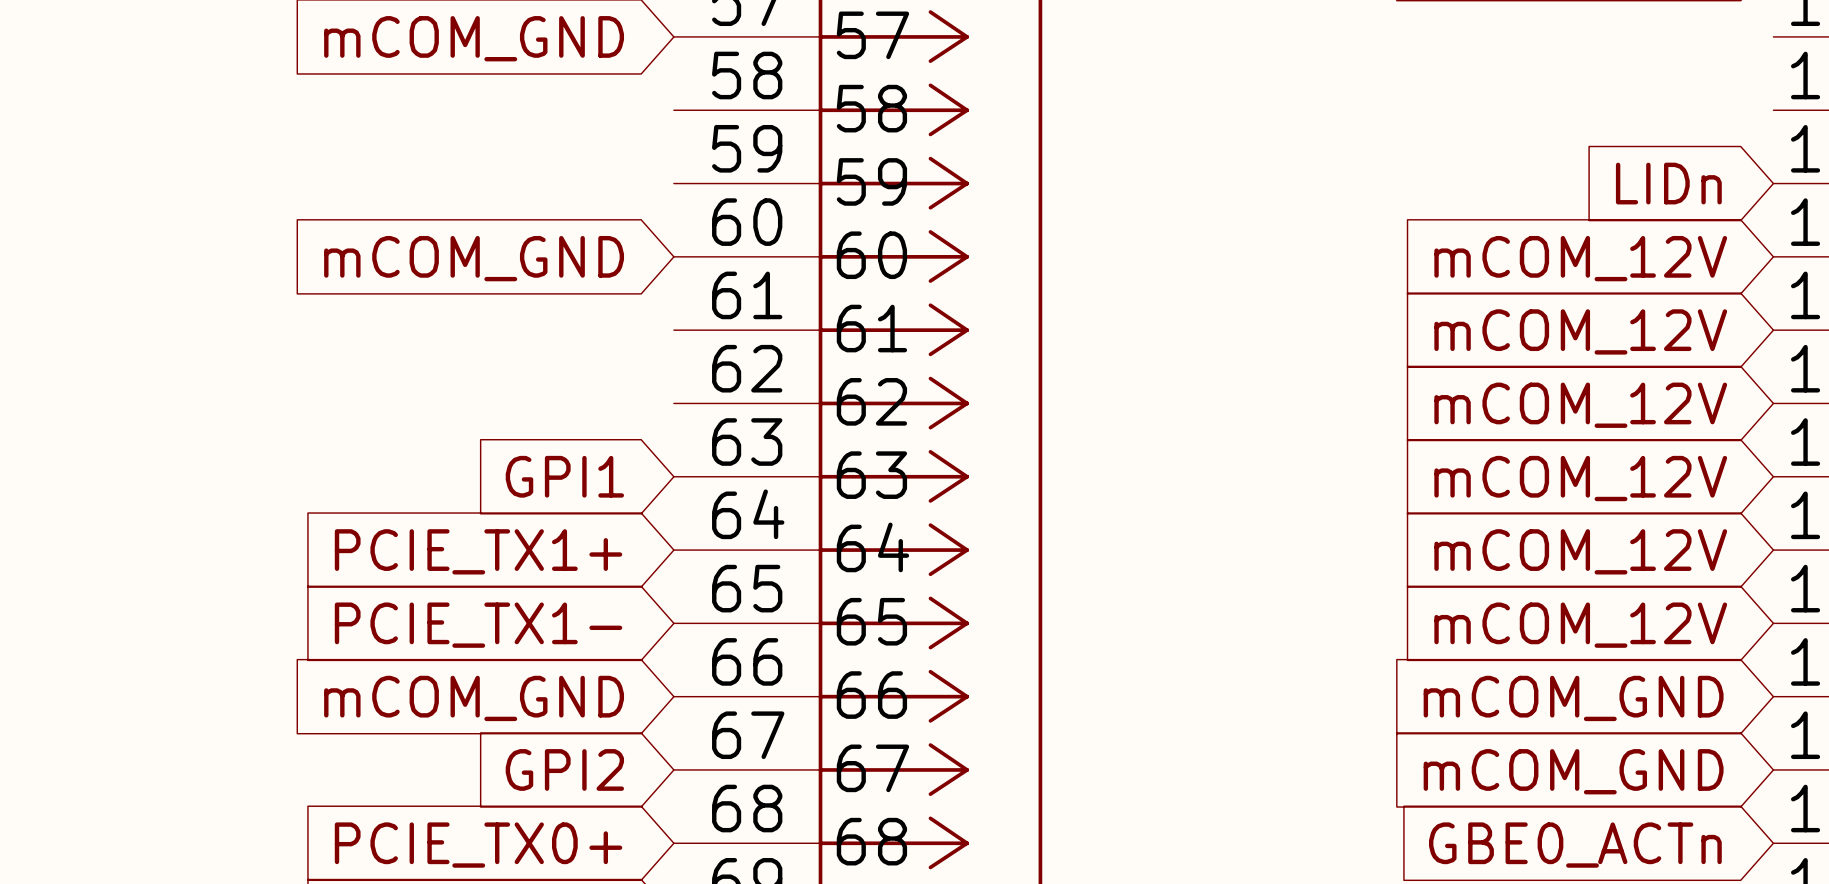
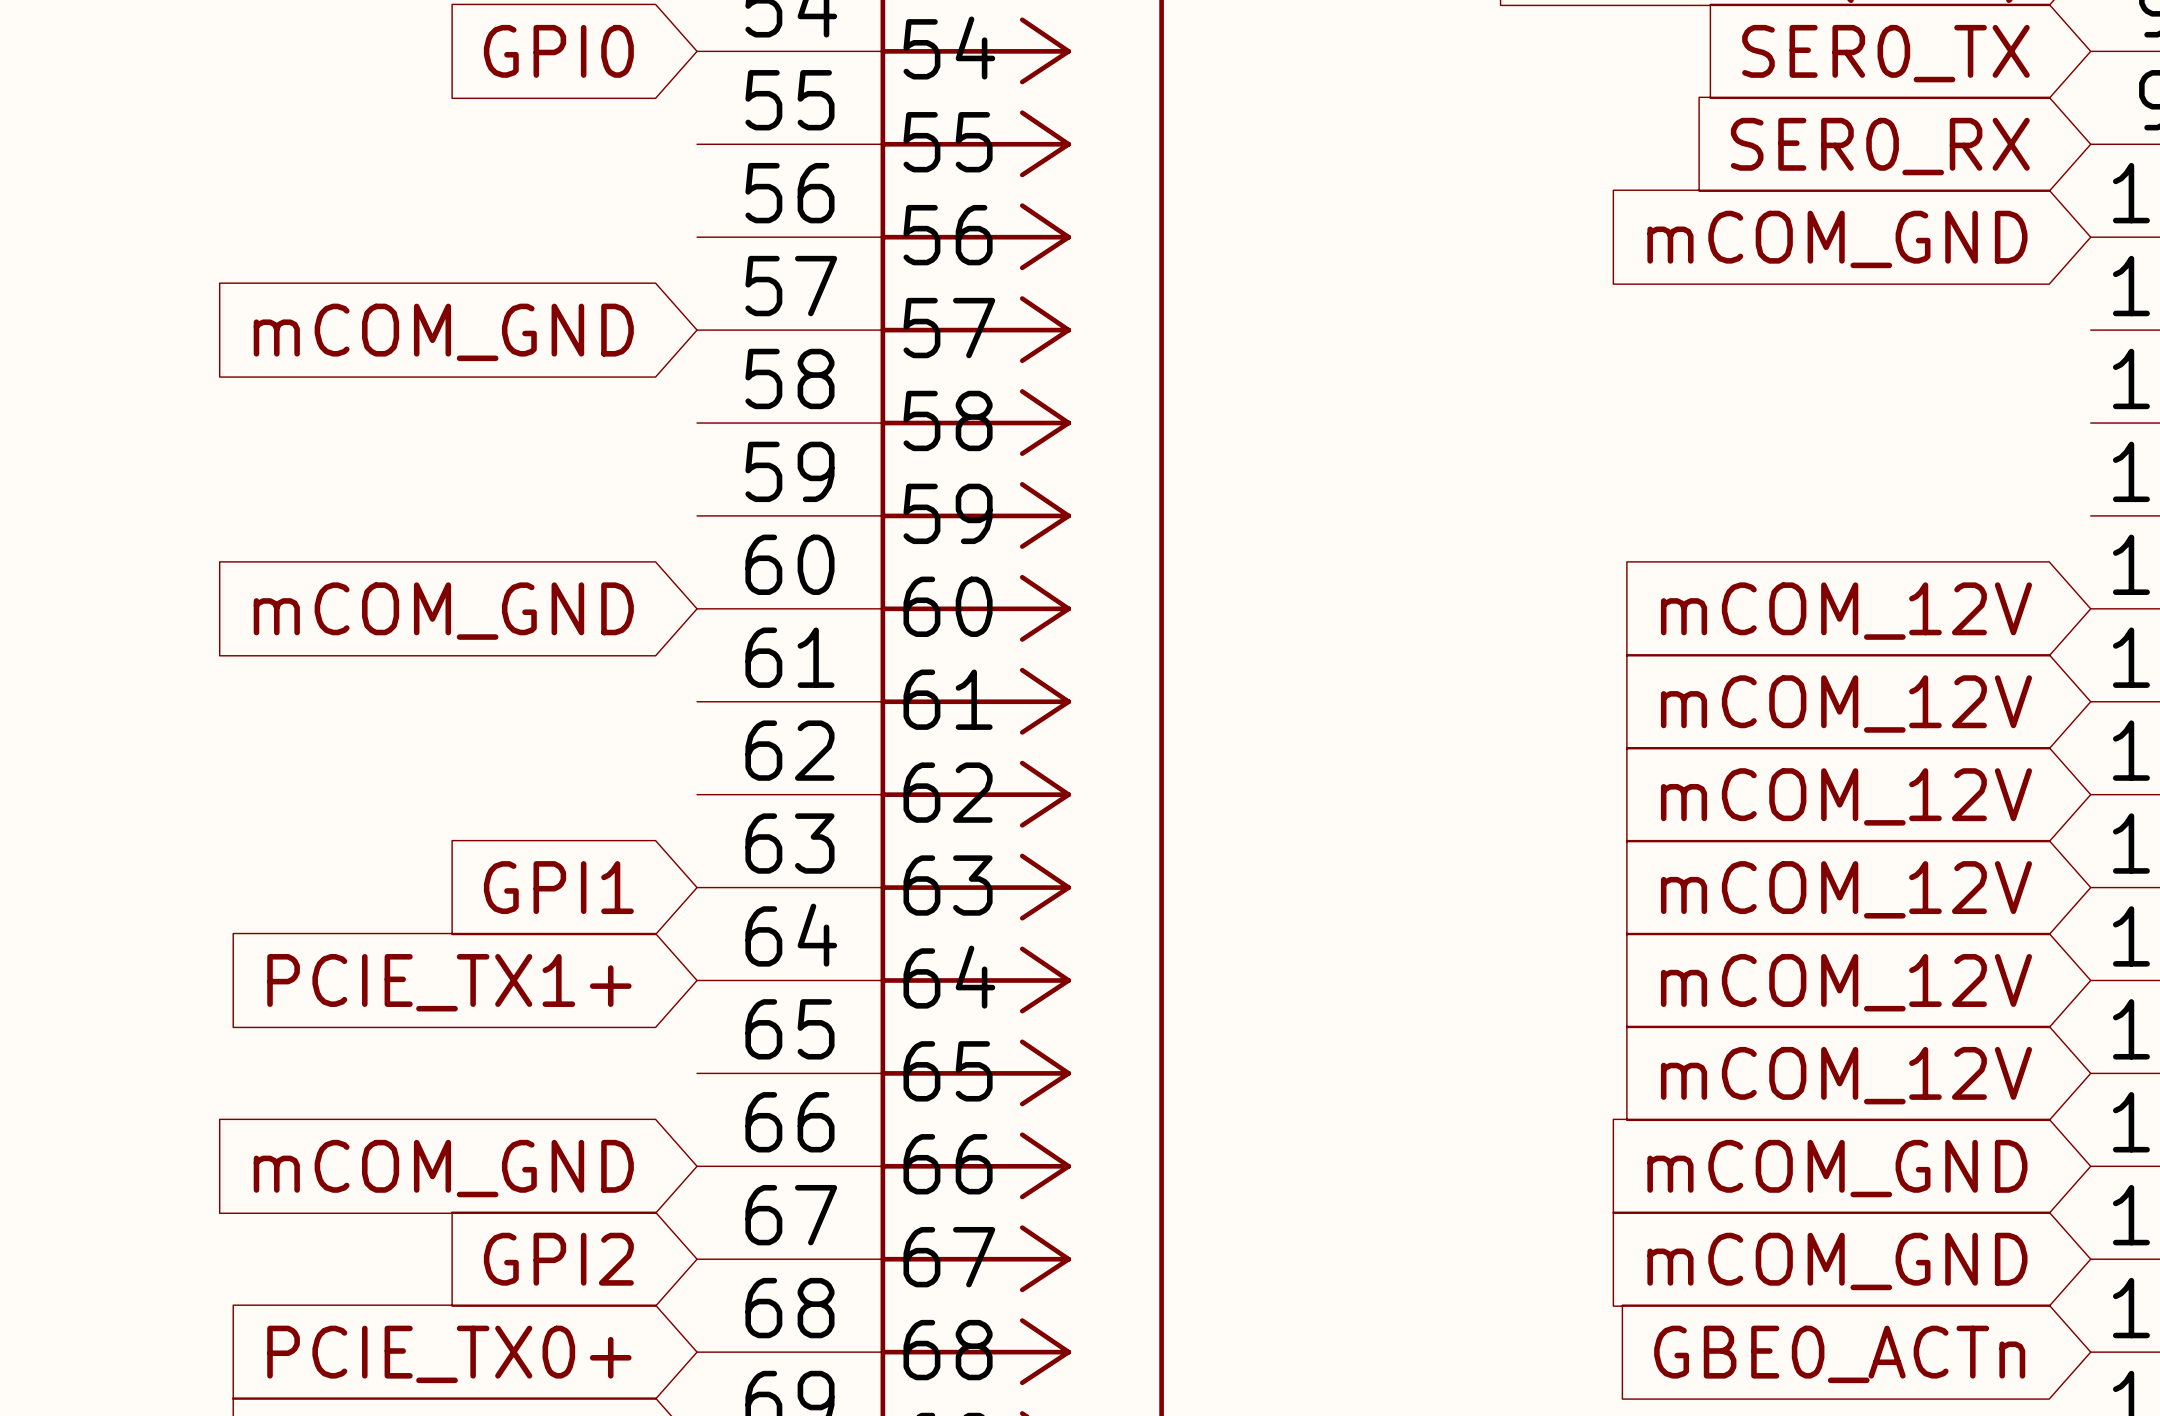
global label: LIDn (1668, 183) -> none
global label: PCIE_TX1- (478, 625) -> none

